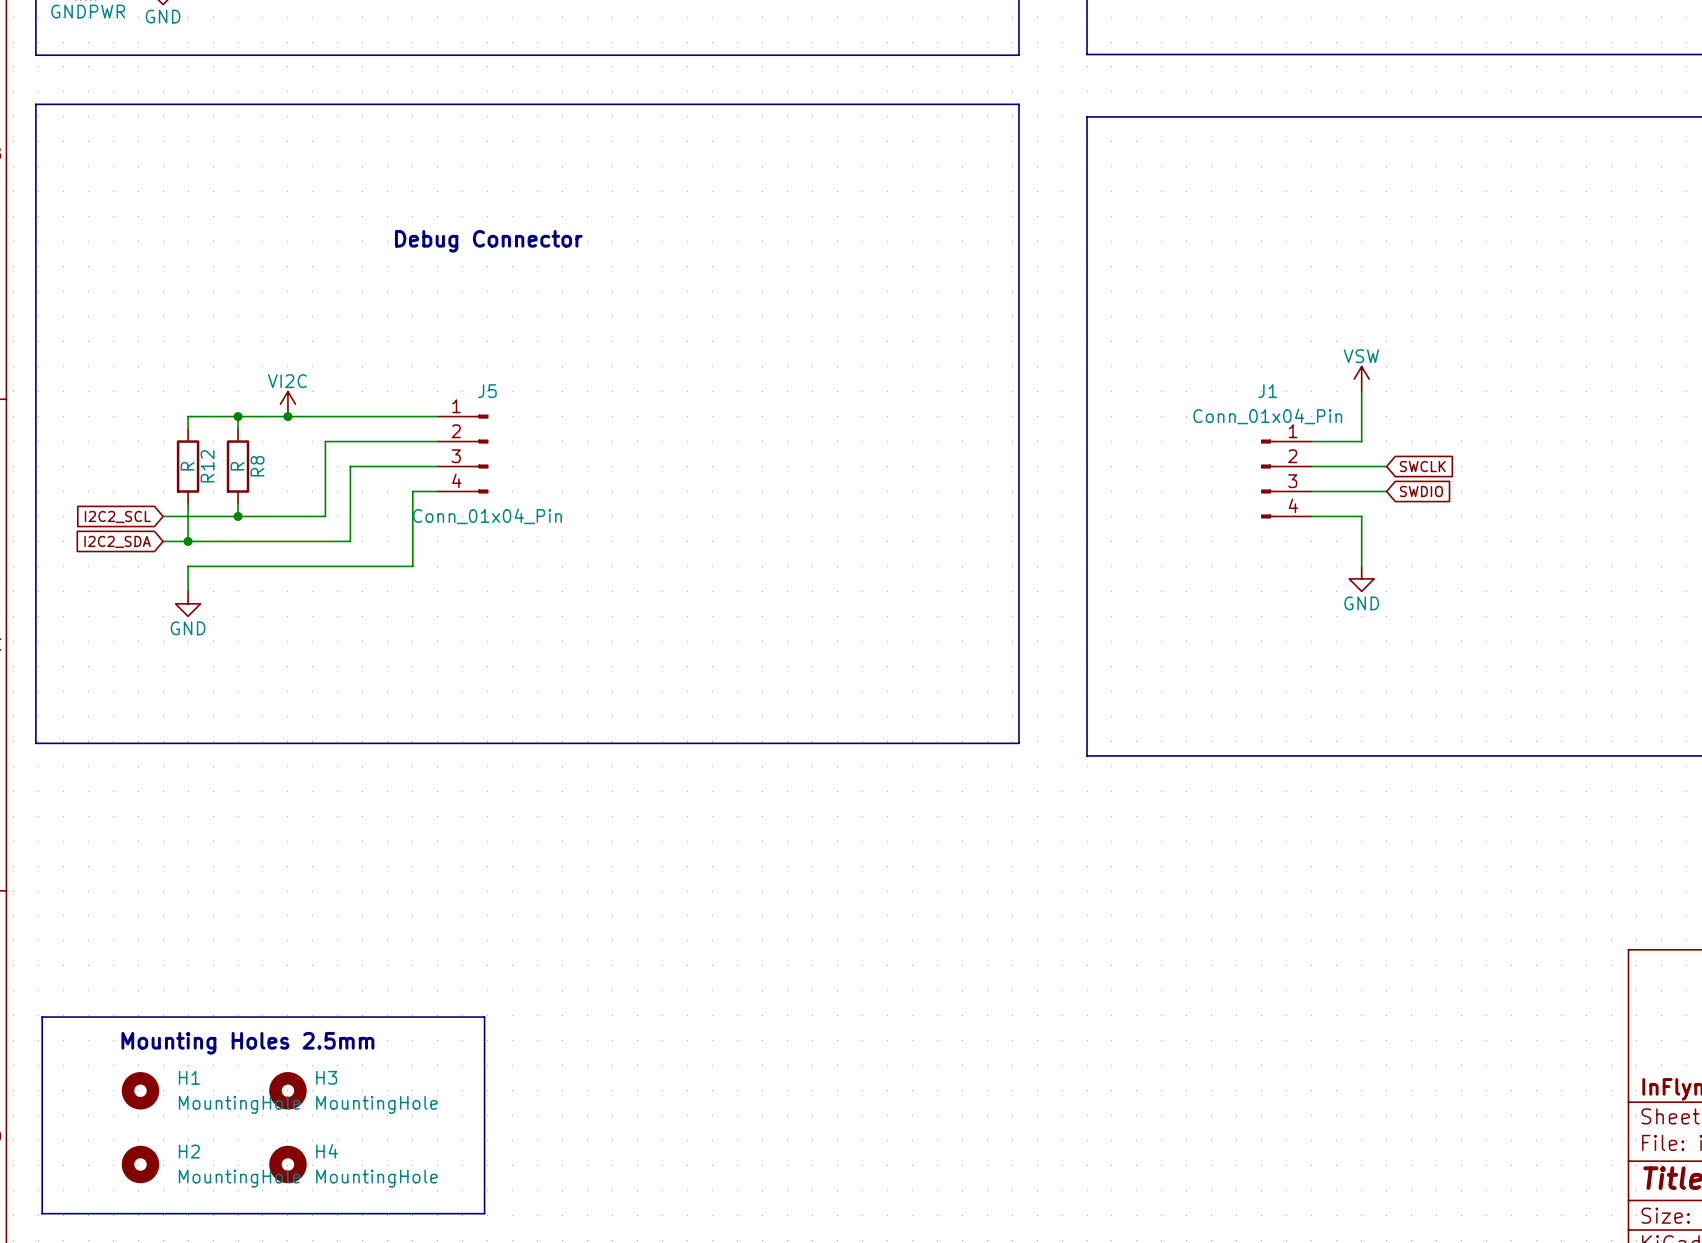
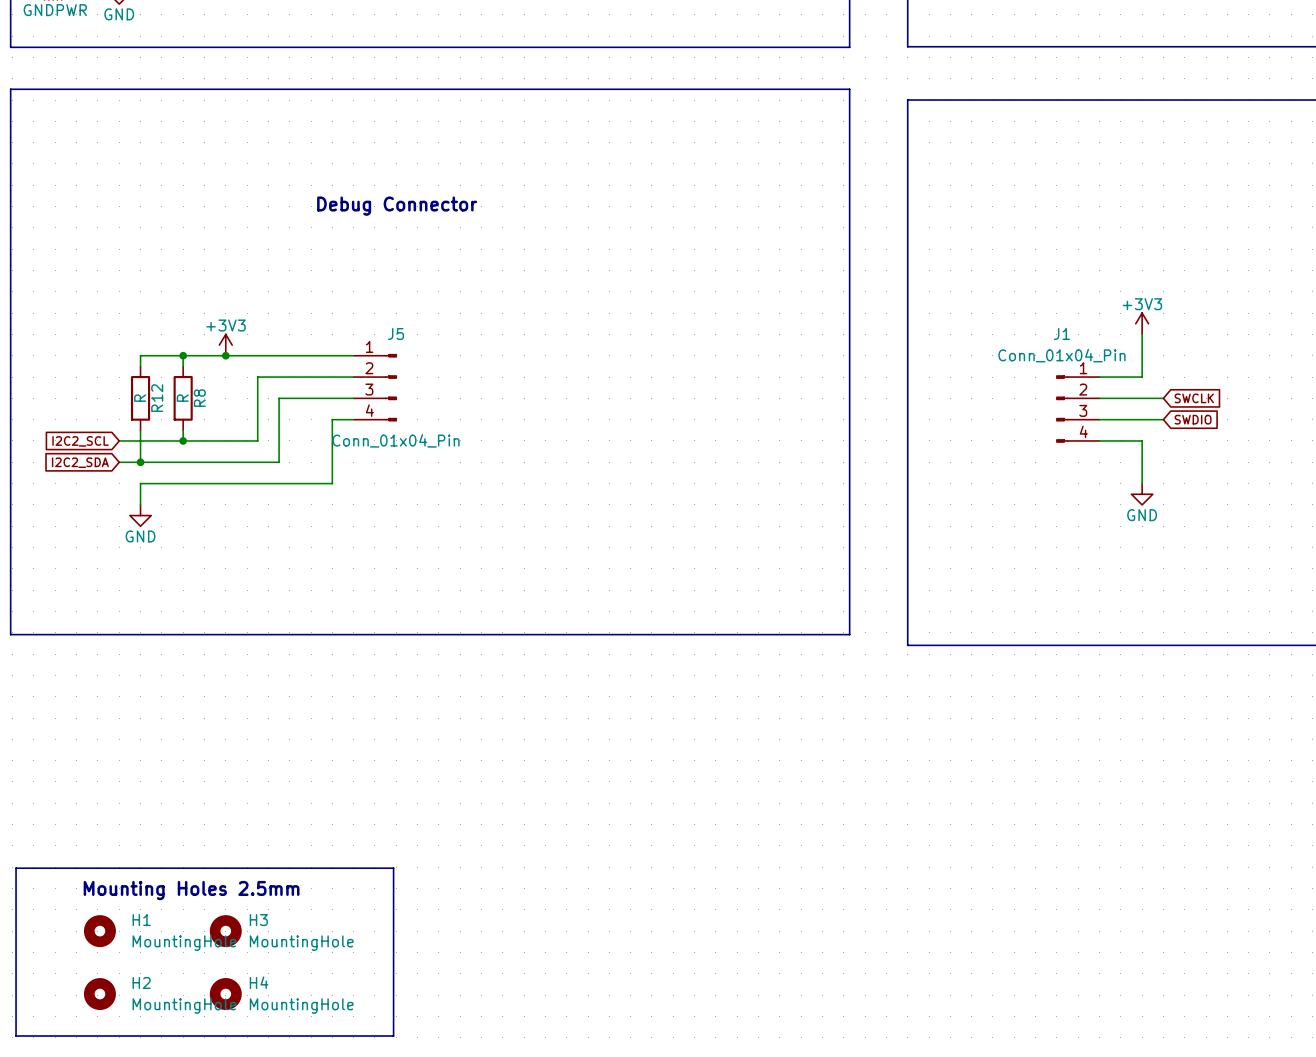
power symbol: VSW (1361, 379) -> +3V3 (1142, 323)
power symbol: VI2C (287, 404) -> +3V3 (225, 345)

